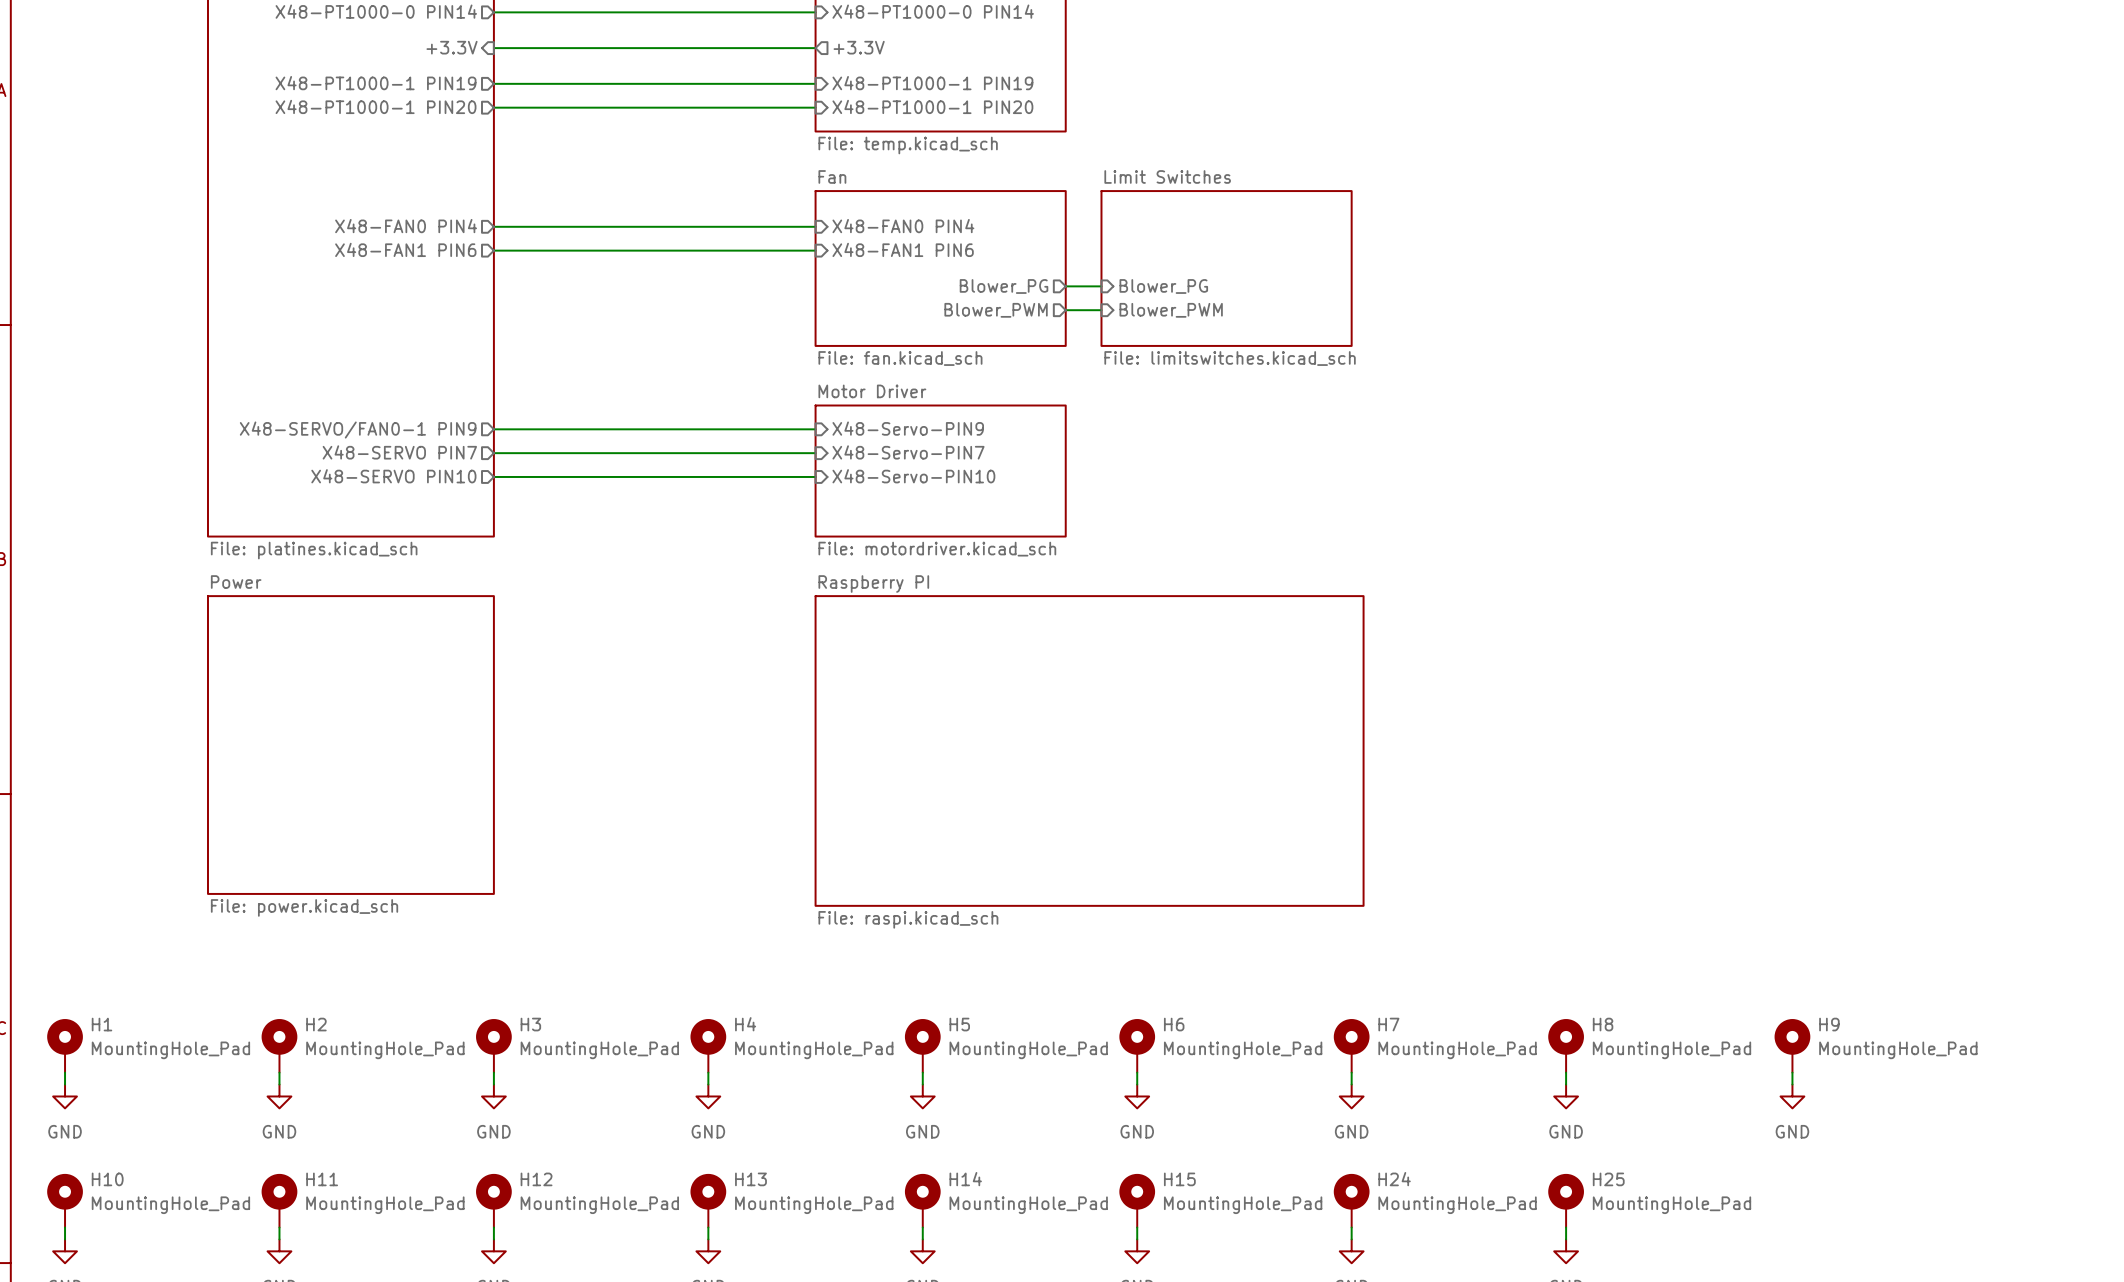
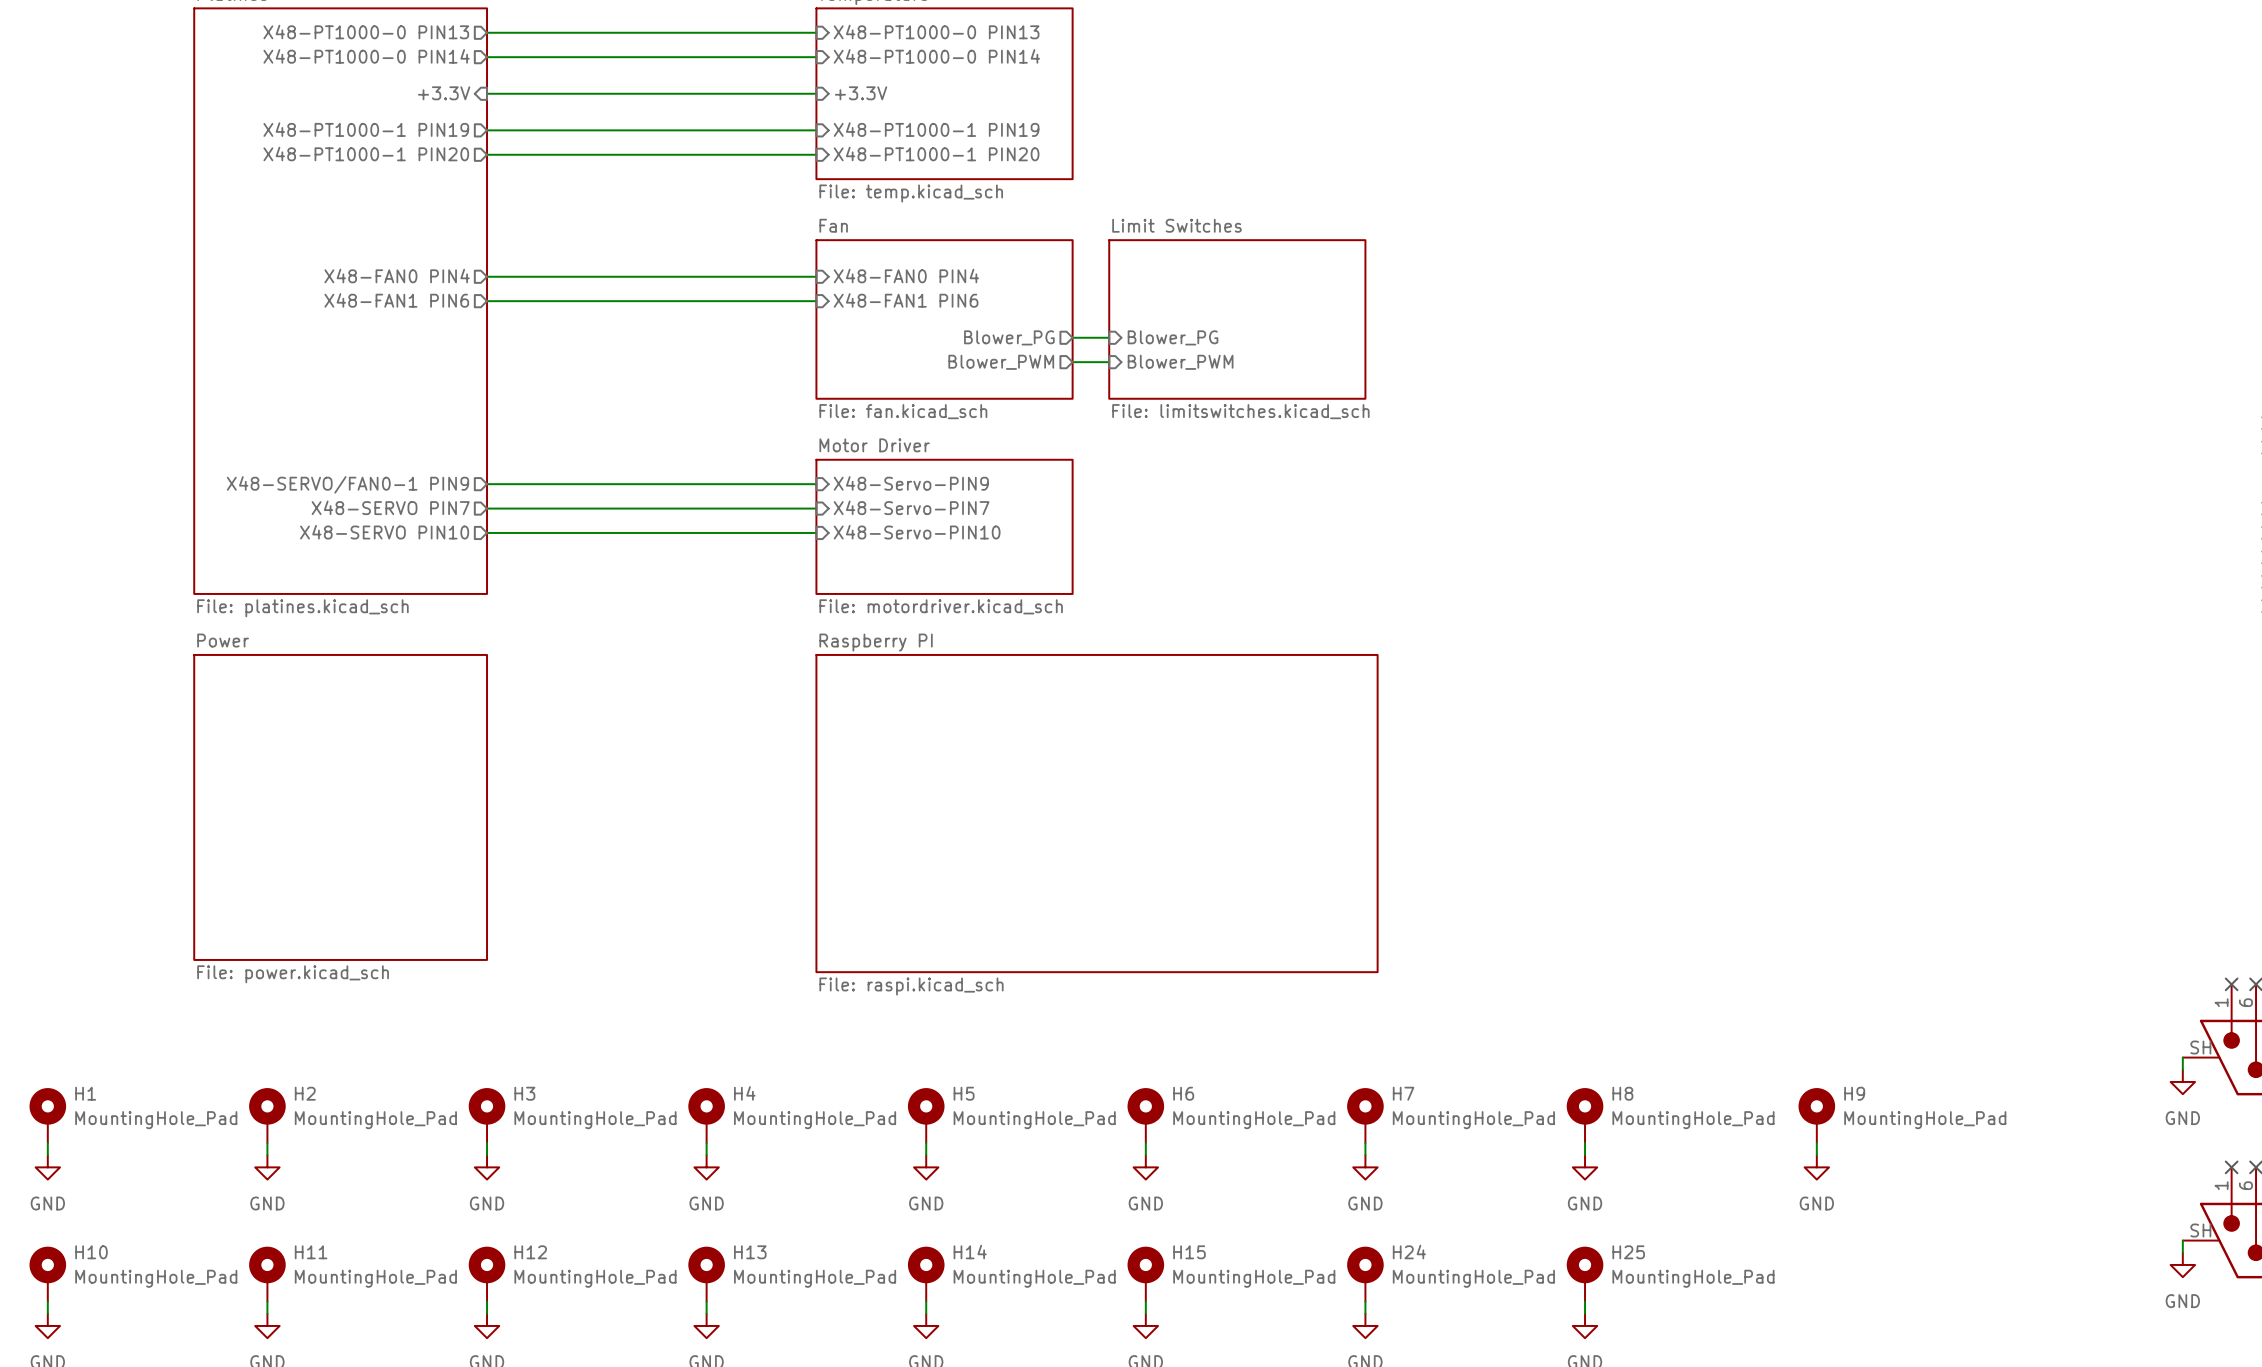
sheet pin shape: output (859, 47) -> input (861, 93)

